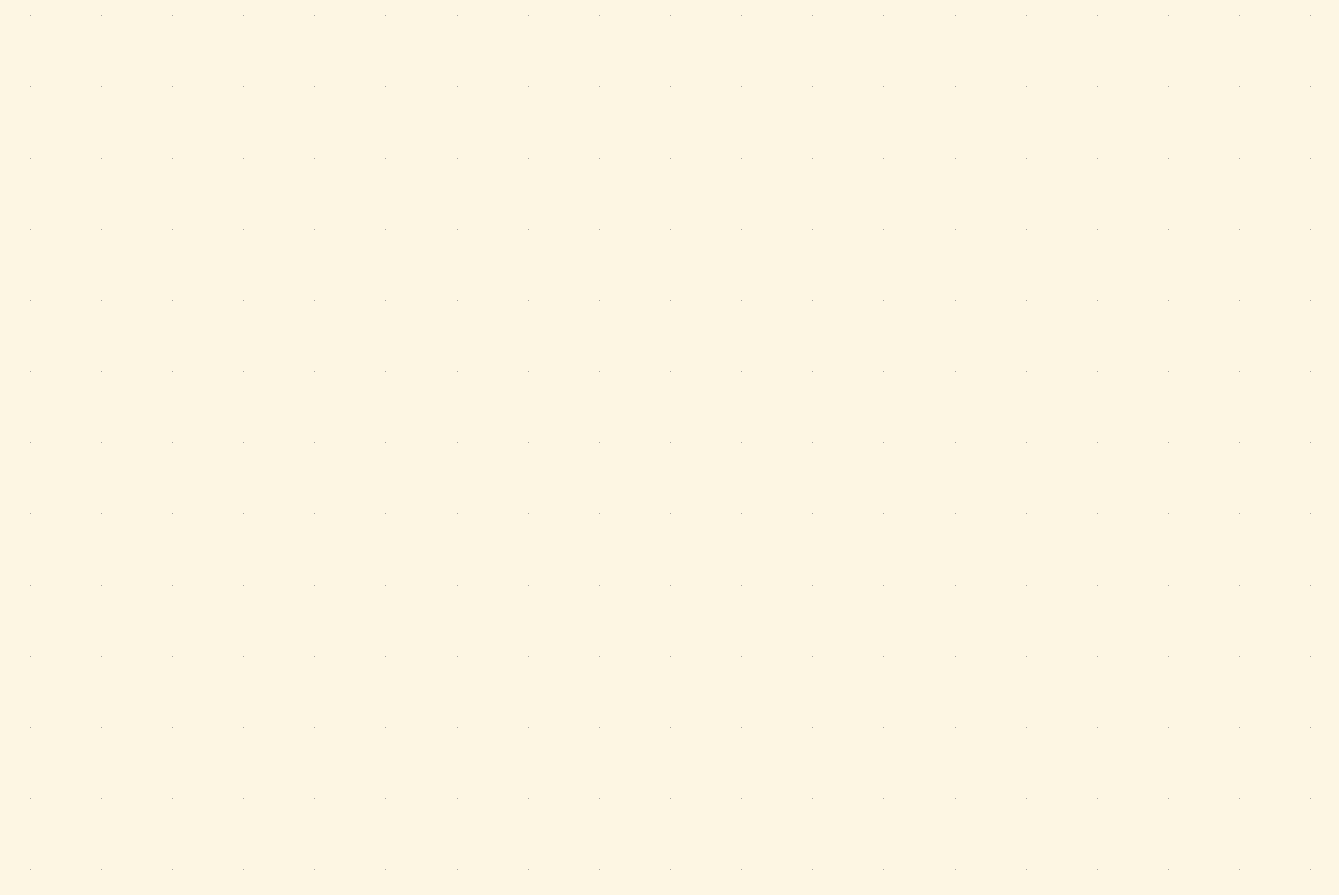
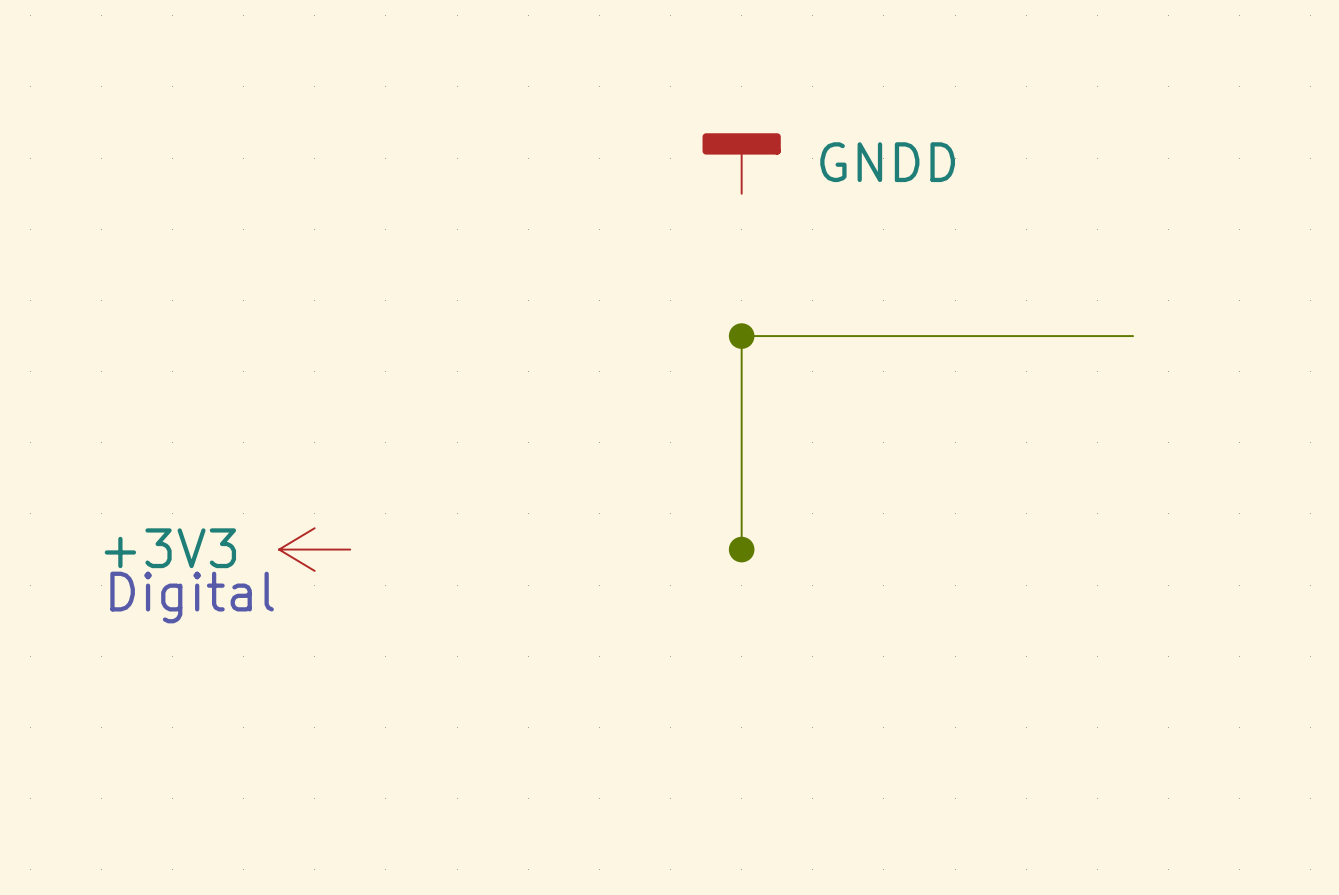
power symbol: none -> GNDD (741, 163)
junction: none -> (741, 336)
wire: none -> (1133, 336) (741, 336) (741, 549)
power symbol: none -> +3V3 (314, 549)
junction: none -> (741, 549)
text: none -> Digital (192, 597)

